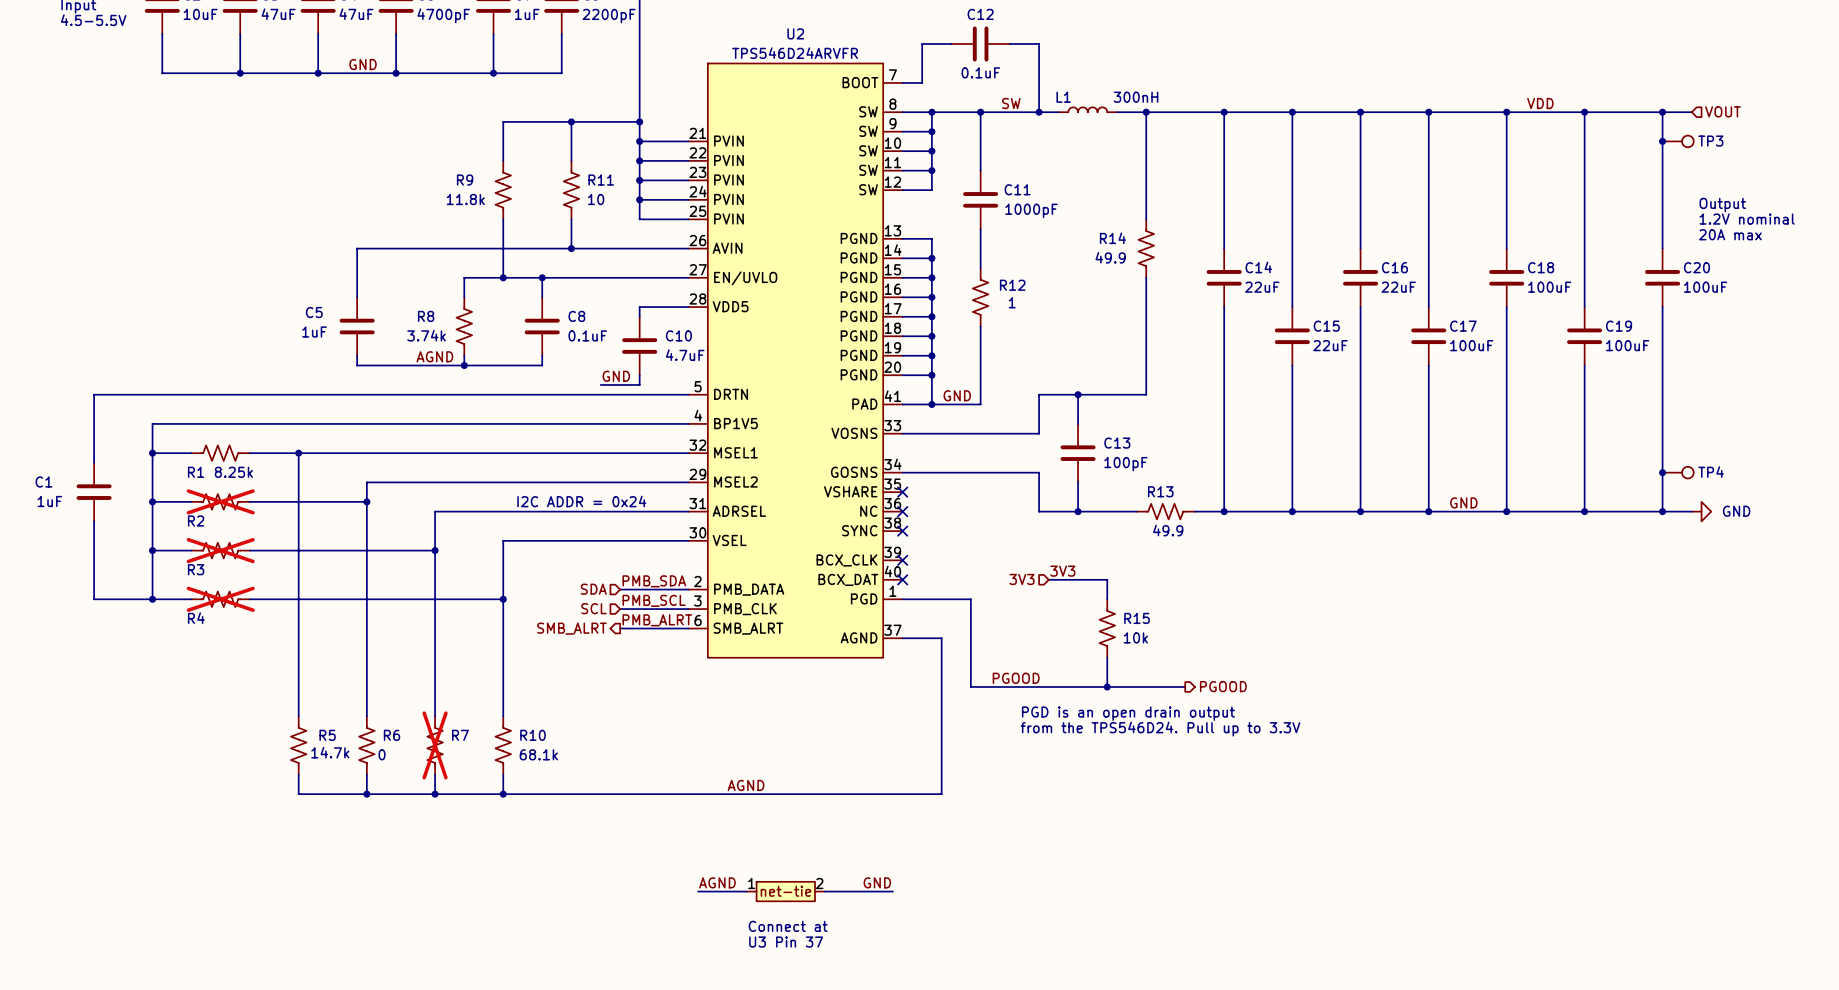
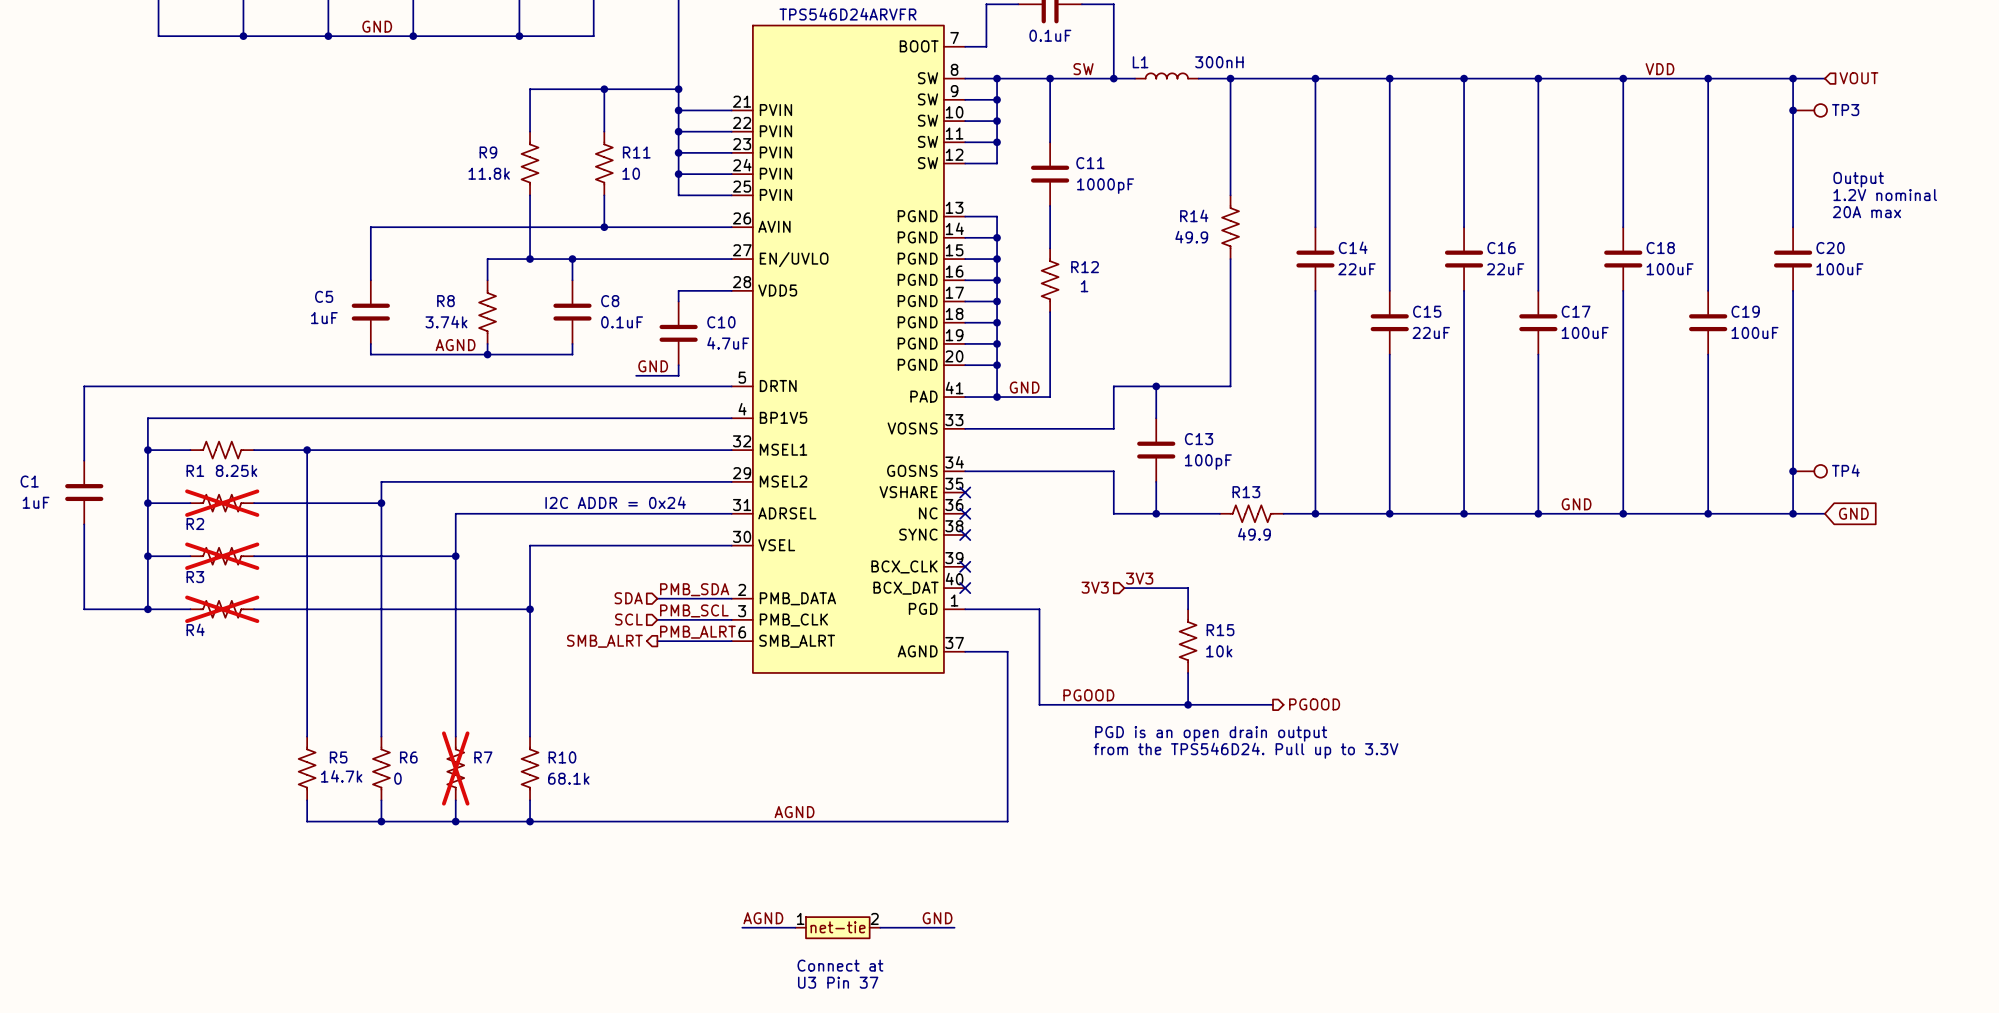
power symbol: GND (1701, 511) -> none
global label: none -> GND (1853, 513)

